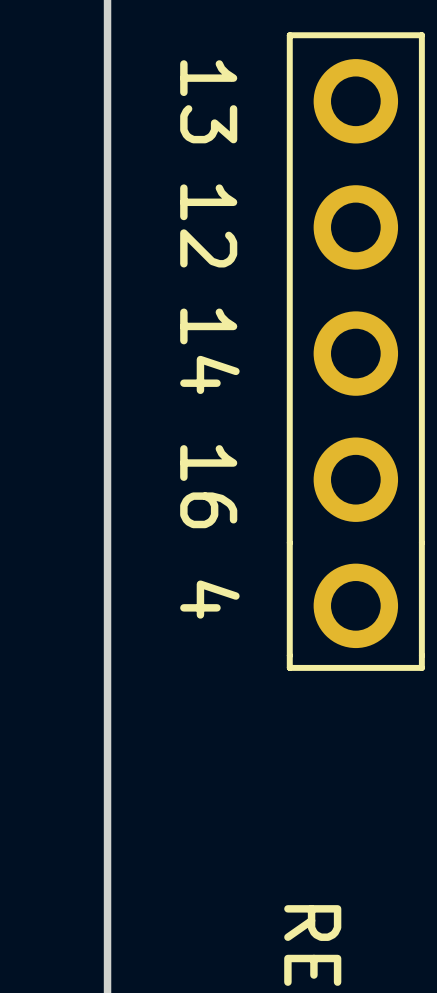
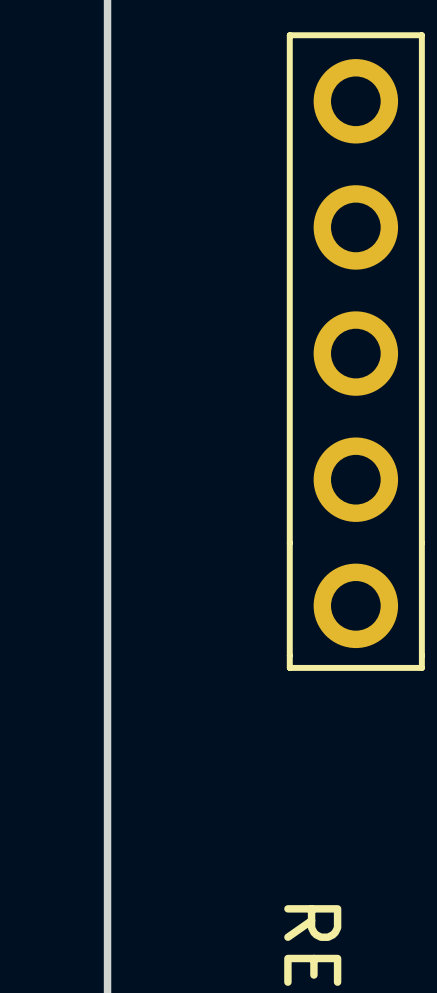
text: 13 (208, 101) -> none
text: 12 (208, 225) -> none
text: 14 (209, 351) -> none
text: 16 (208, 486) -> none
text: 4 (209, 599) -> none

